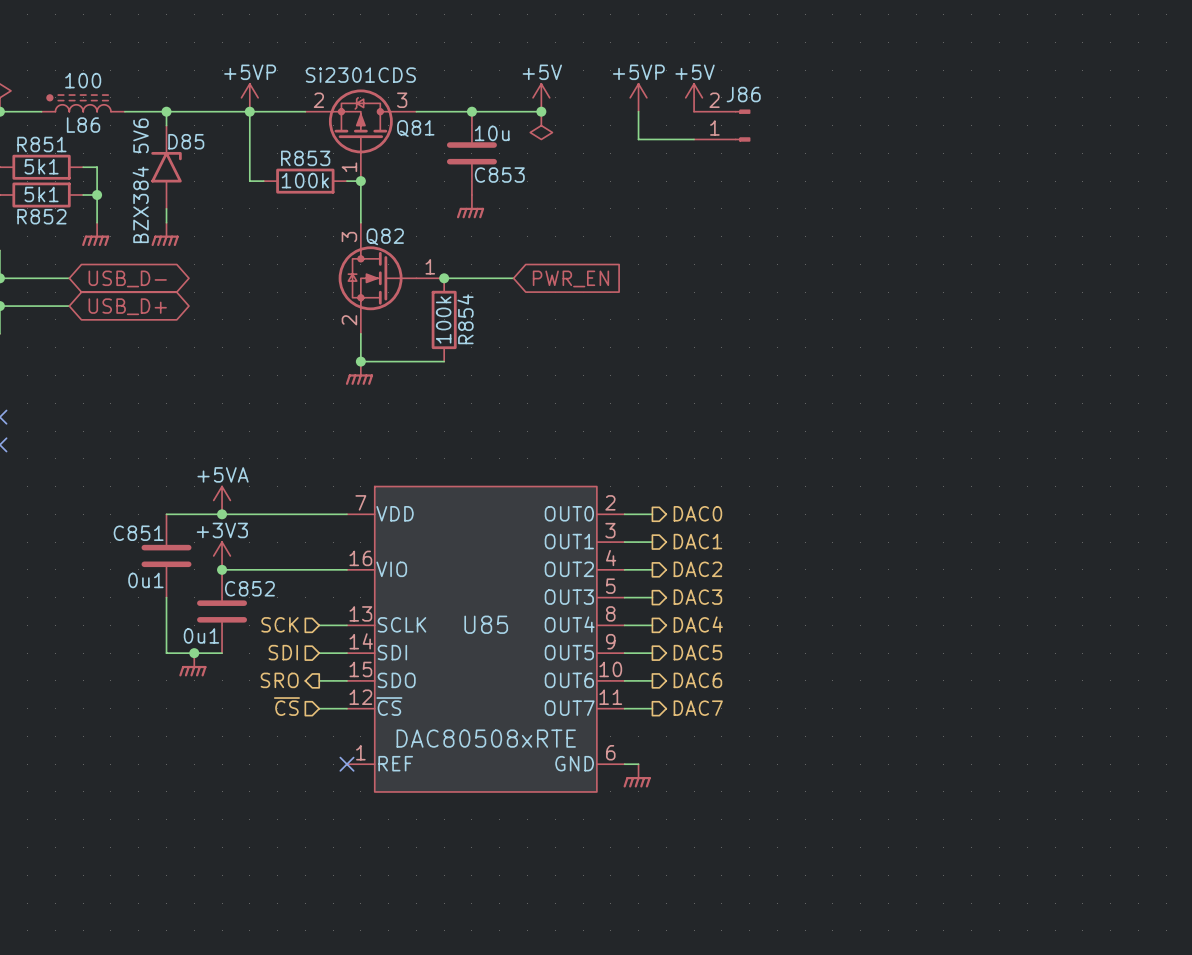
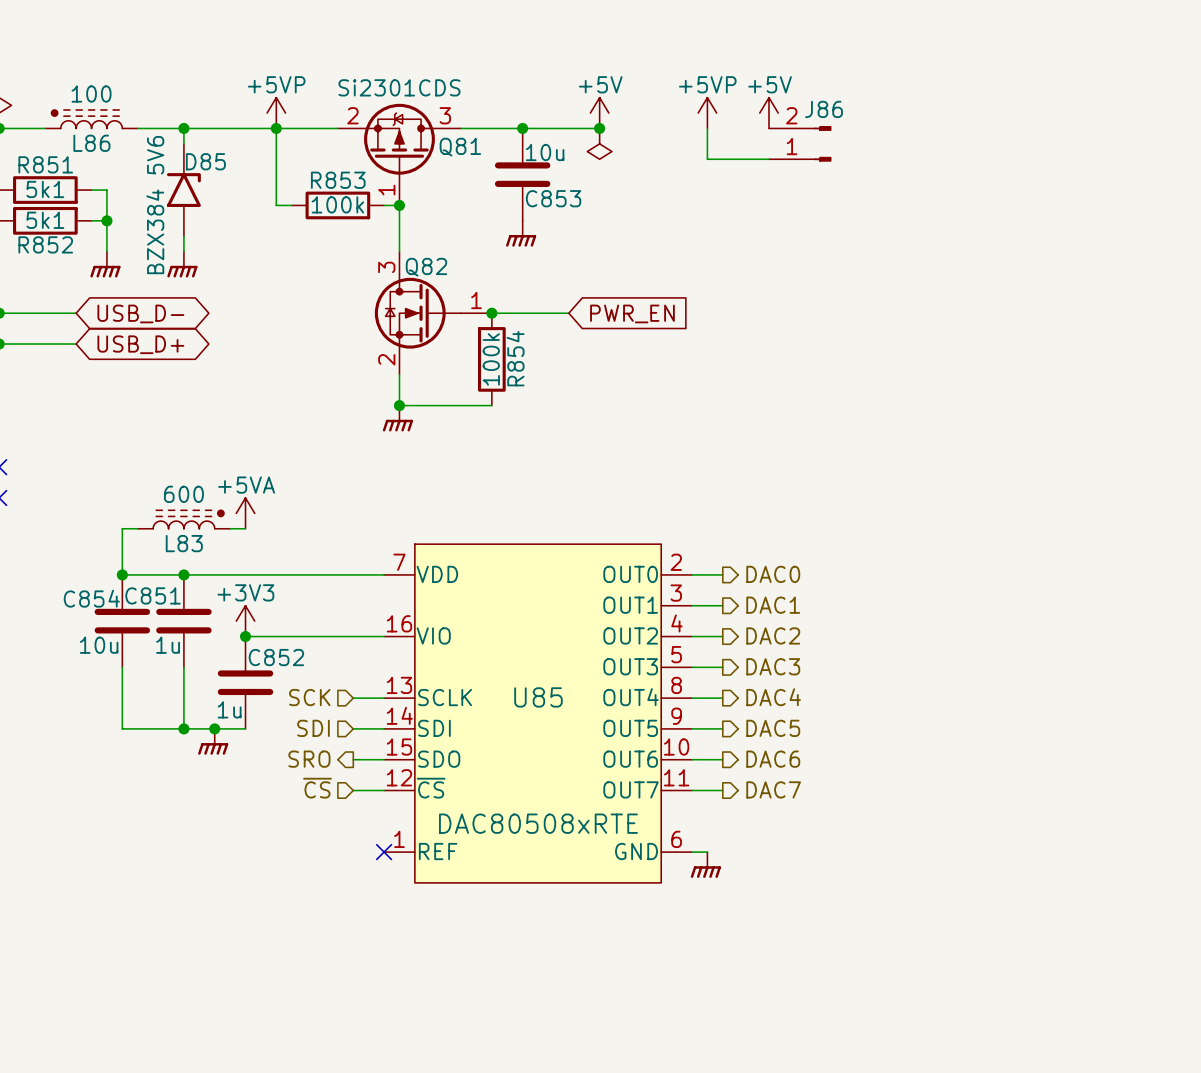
L83: none -> 600 (183, 519)
wire: none -> (137, 528) (122, 528) (122, 574) (183, 574)
wire: none -> (230, 528) (245, 528)
power symbol position: +5VA (222, 500) -> +5VA (245, 513)
junction: none -> (122, 574)
junction: none -> (183, 574)
junction: (222, 514) -> none
C854: none -> 10u (122, 621)
C851 value: 0u1 (145, 580) -> 1u (168, 645)
wire: none -> (122, 667) (122, 728) (183, 728)
C852 value: 0u1 (201, 635) -> 1u (229, 709)
junction: none -> (183, 728)

